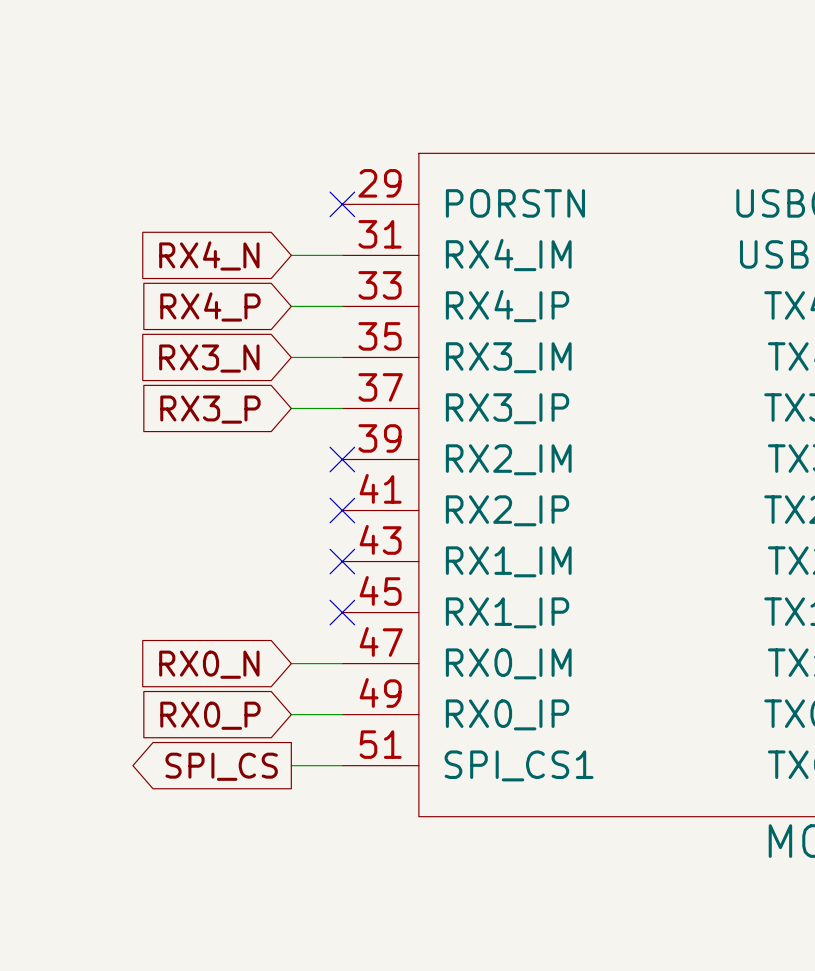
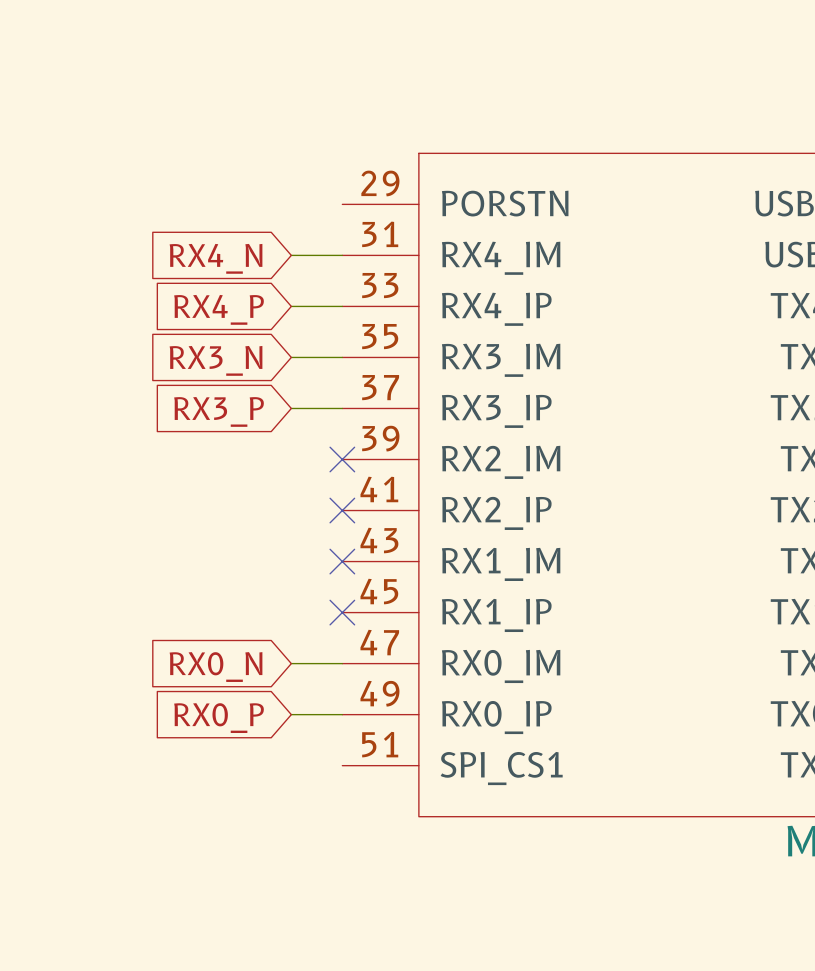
no-connect mark: (342, 204) -> none
wire: (291, 765) (342, 765) -> none
global label: SPI_CS (221, 766) -> none

